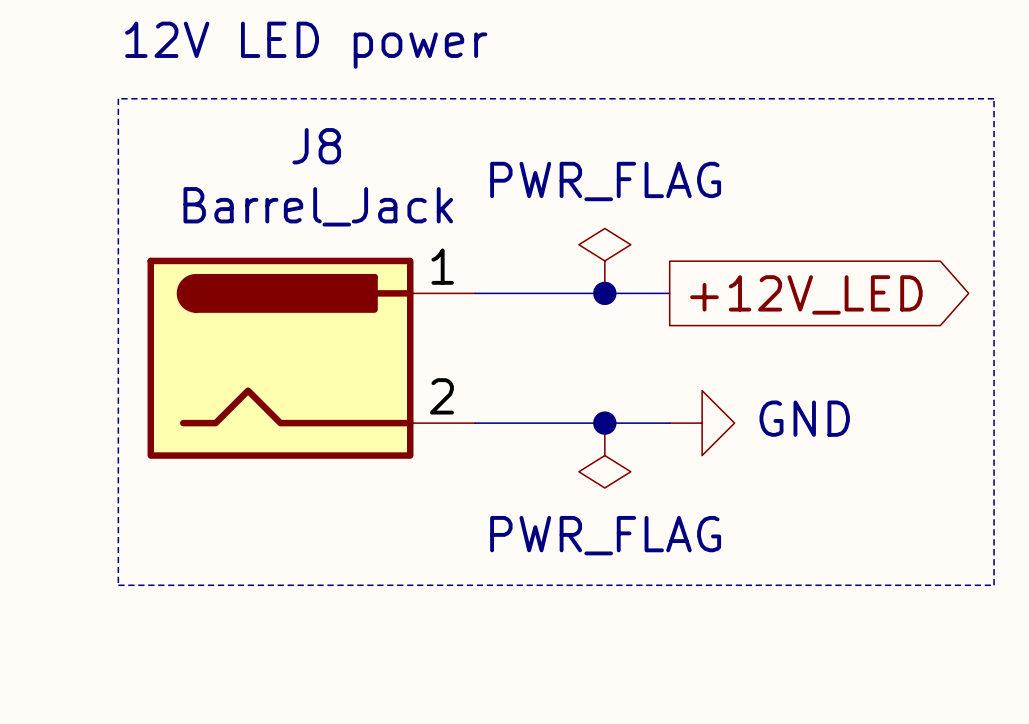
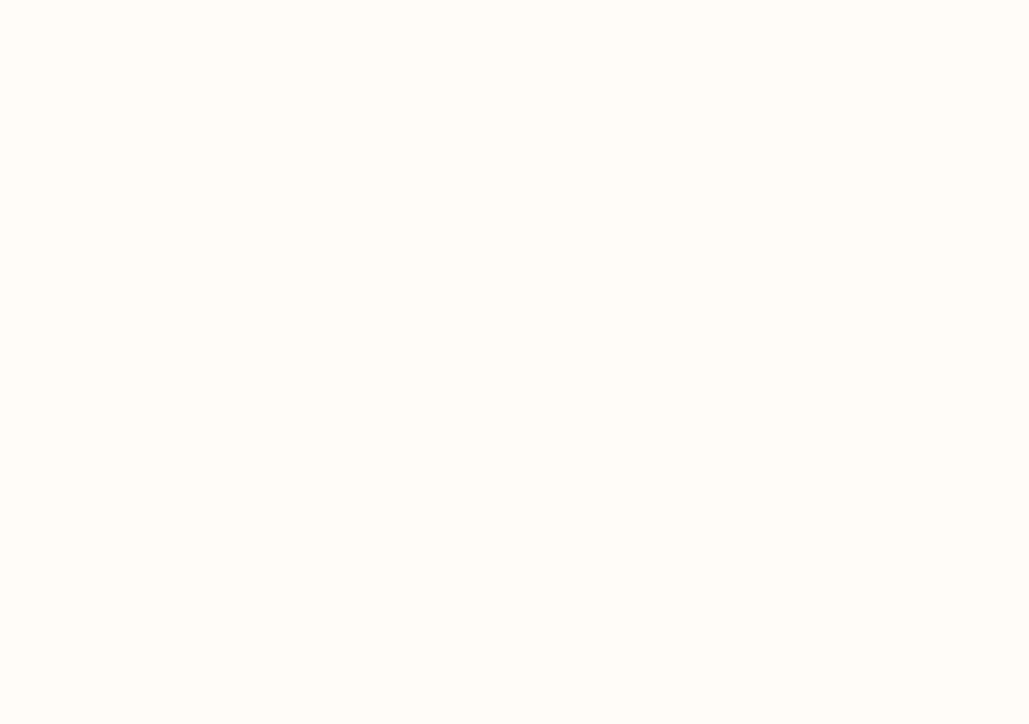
text: 12V LED power (306, 45) -> none
line: (118, 98) (118, 585) (994, 585) (994, 98) (118, 98) -> none
power symbol: PWR_FLAG (604, 260) -> none
wire: (475, 293) (669, 293) -> none
junction: (604, 293) -> none
global label: +12V_LED (806, 294) -> none
J8: Barrel_Jack (311, 358) -> none
wire: (475, 423) (669, 423) -> none
junction: (604, 423) -> none
power symbol: GND (702, 423) -> none
power symbol: PWR_FLAG (604, 455) -> none

